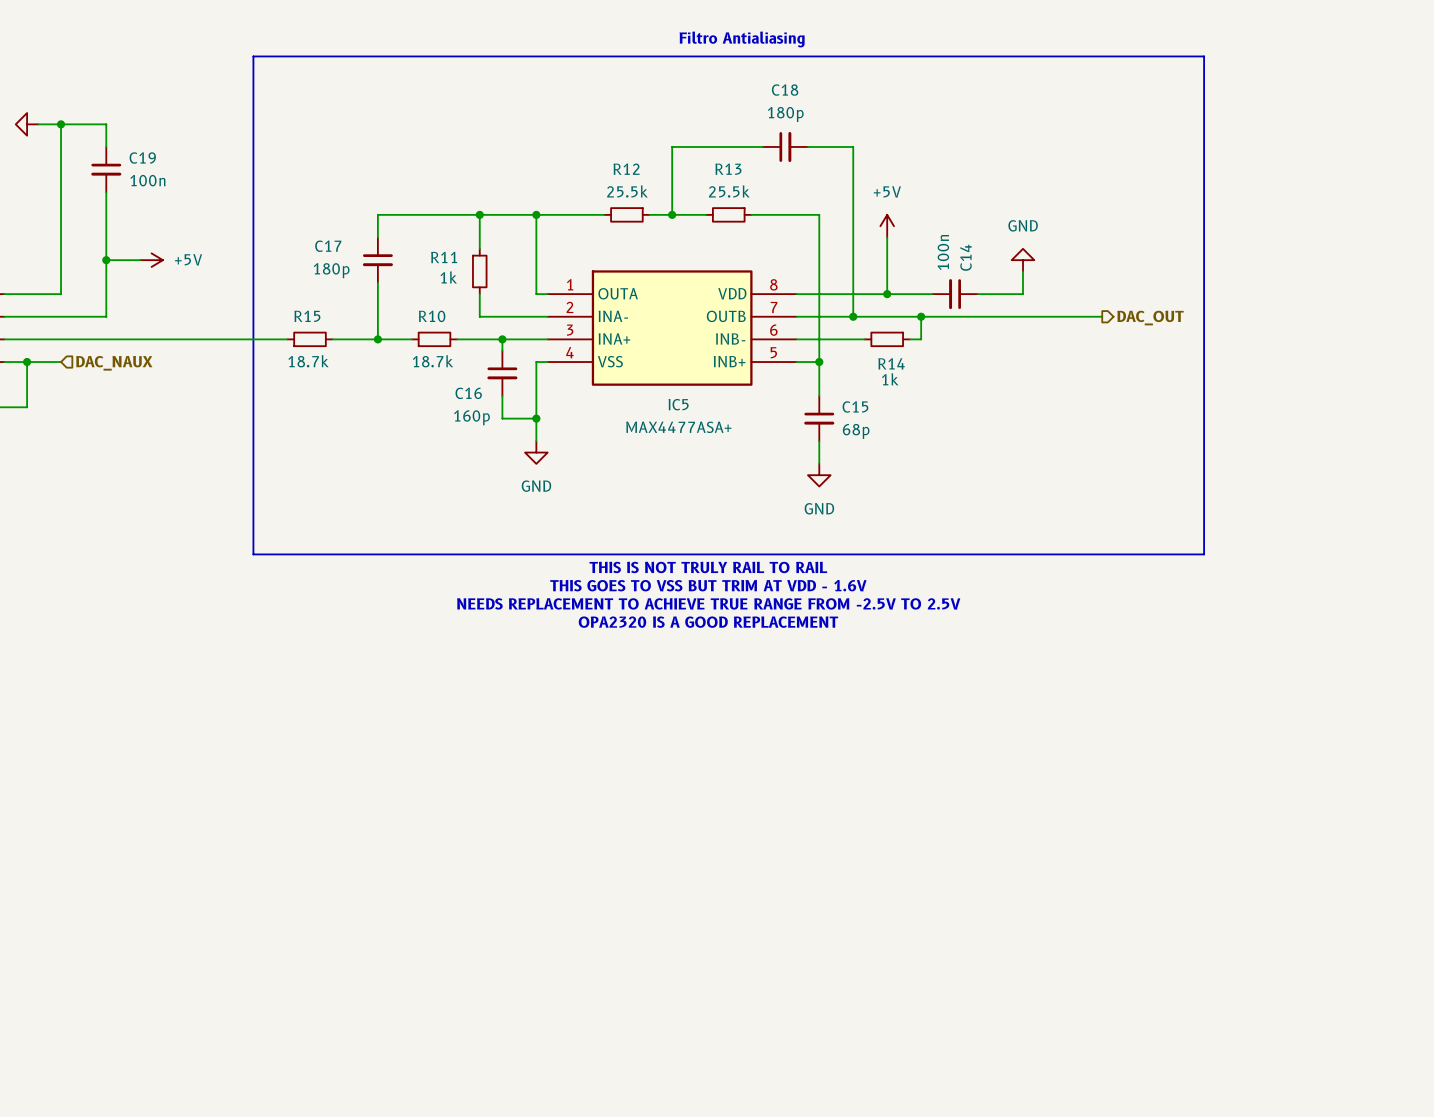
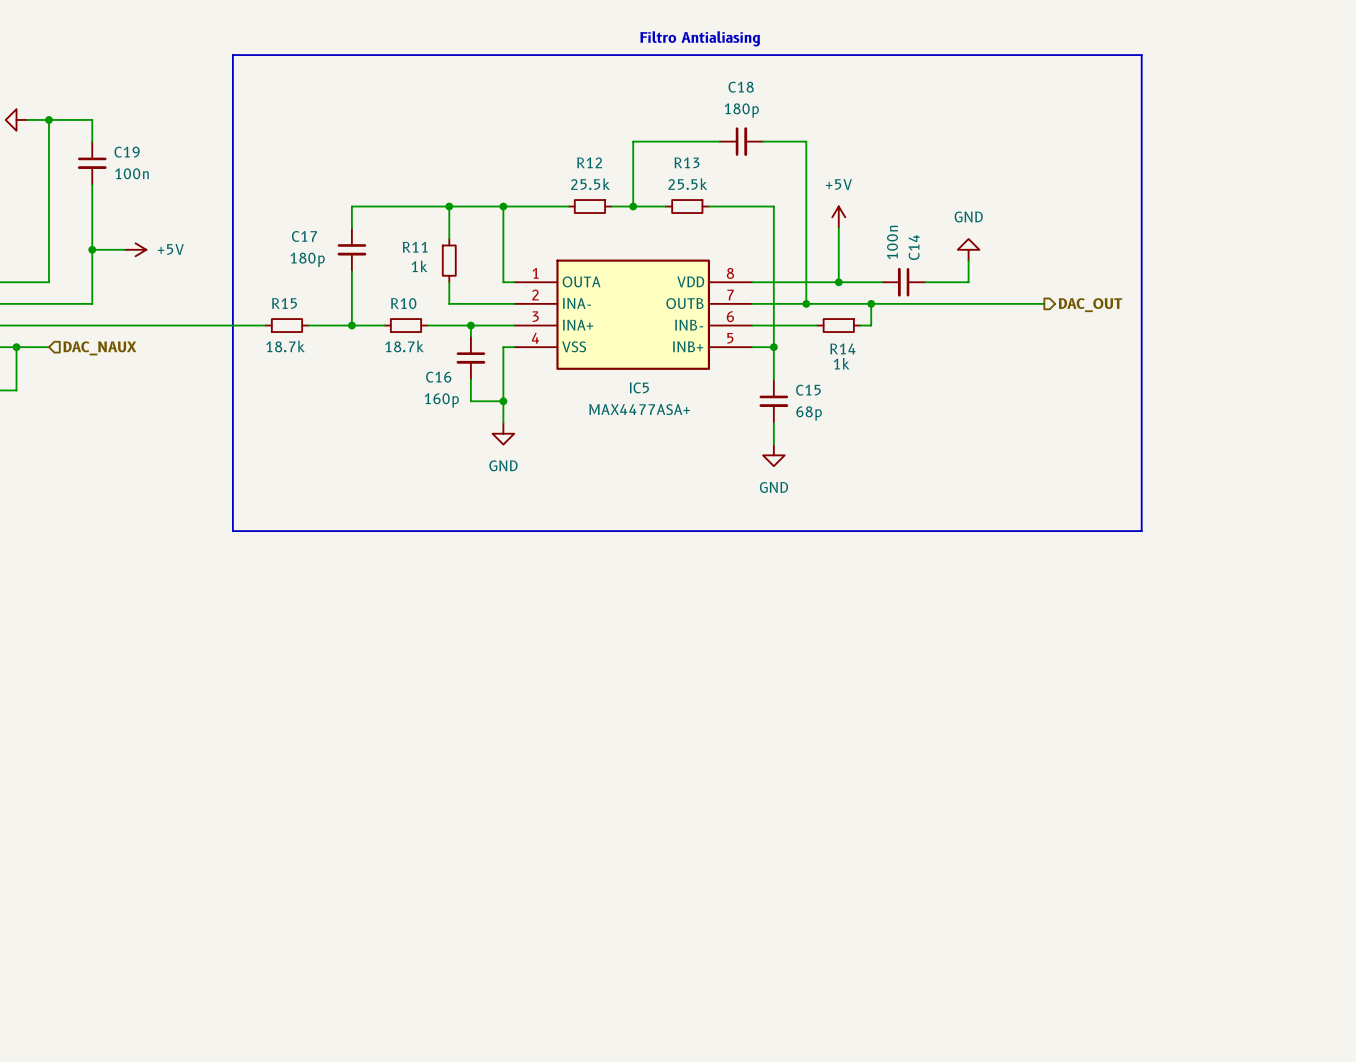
text: THIS IS NOT TRULY RAIL TO RAIL (708, 567) -> none
text: THIS GOES TO VSS BUT TRIM AT VDD - 1.6V (708, 585) -> none
text: NEEDS REPLACEMENT TO ACHIEVE TRUE RANGE FROM -2.5V TO 2.5V (708, 603) -> none
text: OPA2320 IS A GOOD REPLACEMENT (708, 622) -> none

